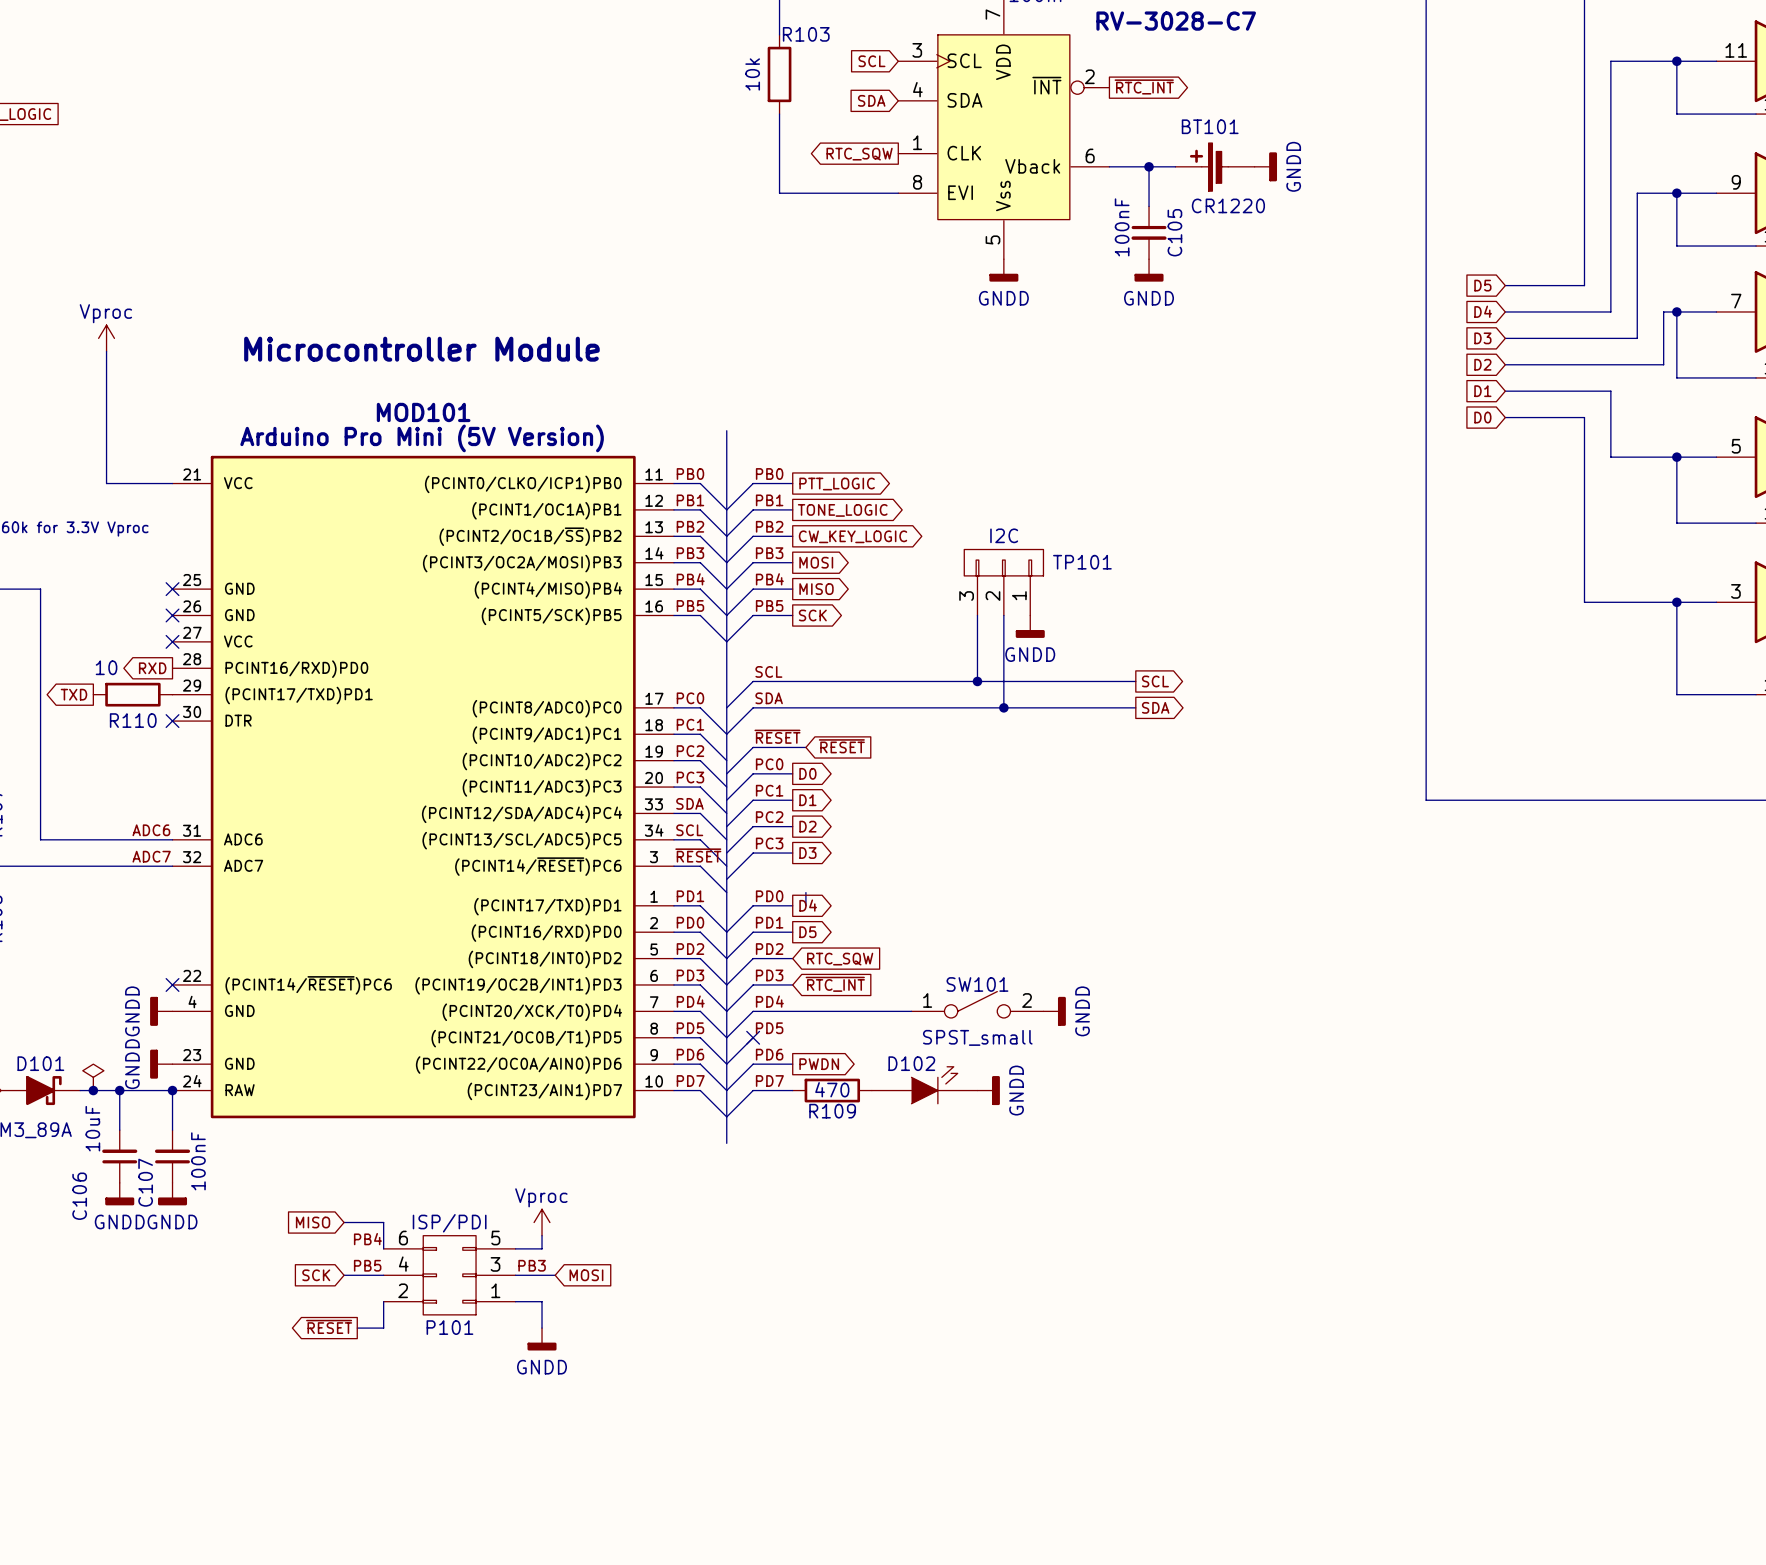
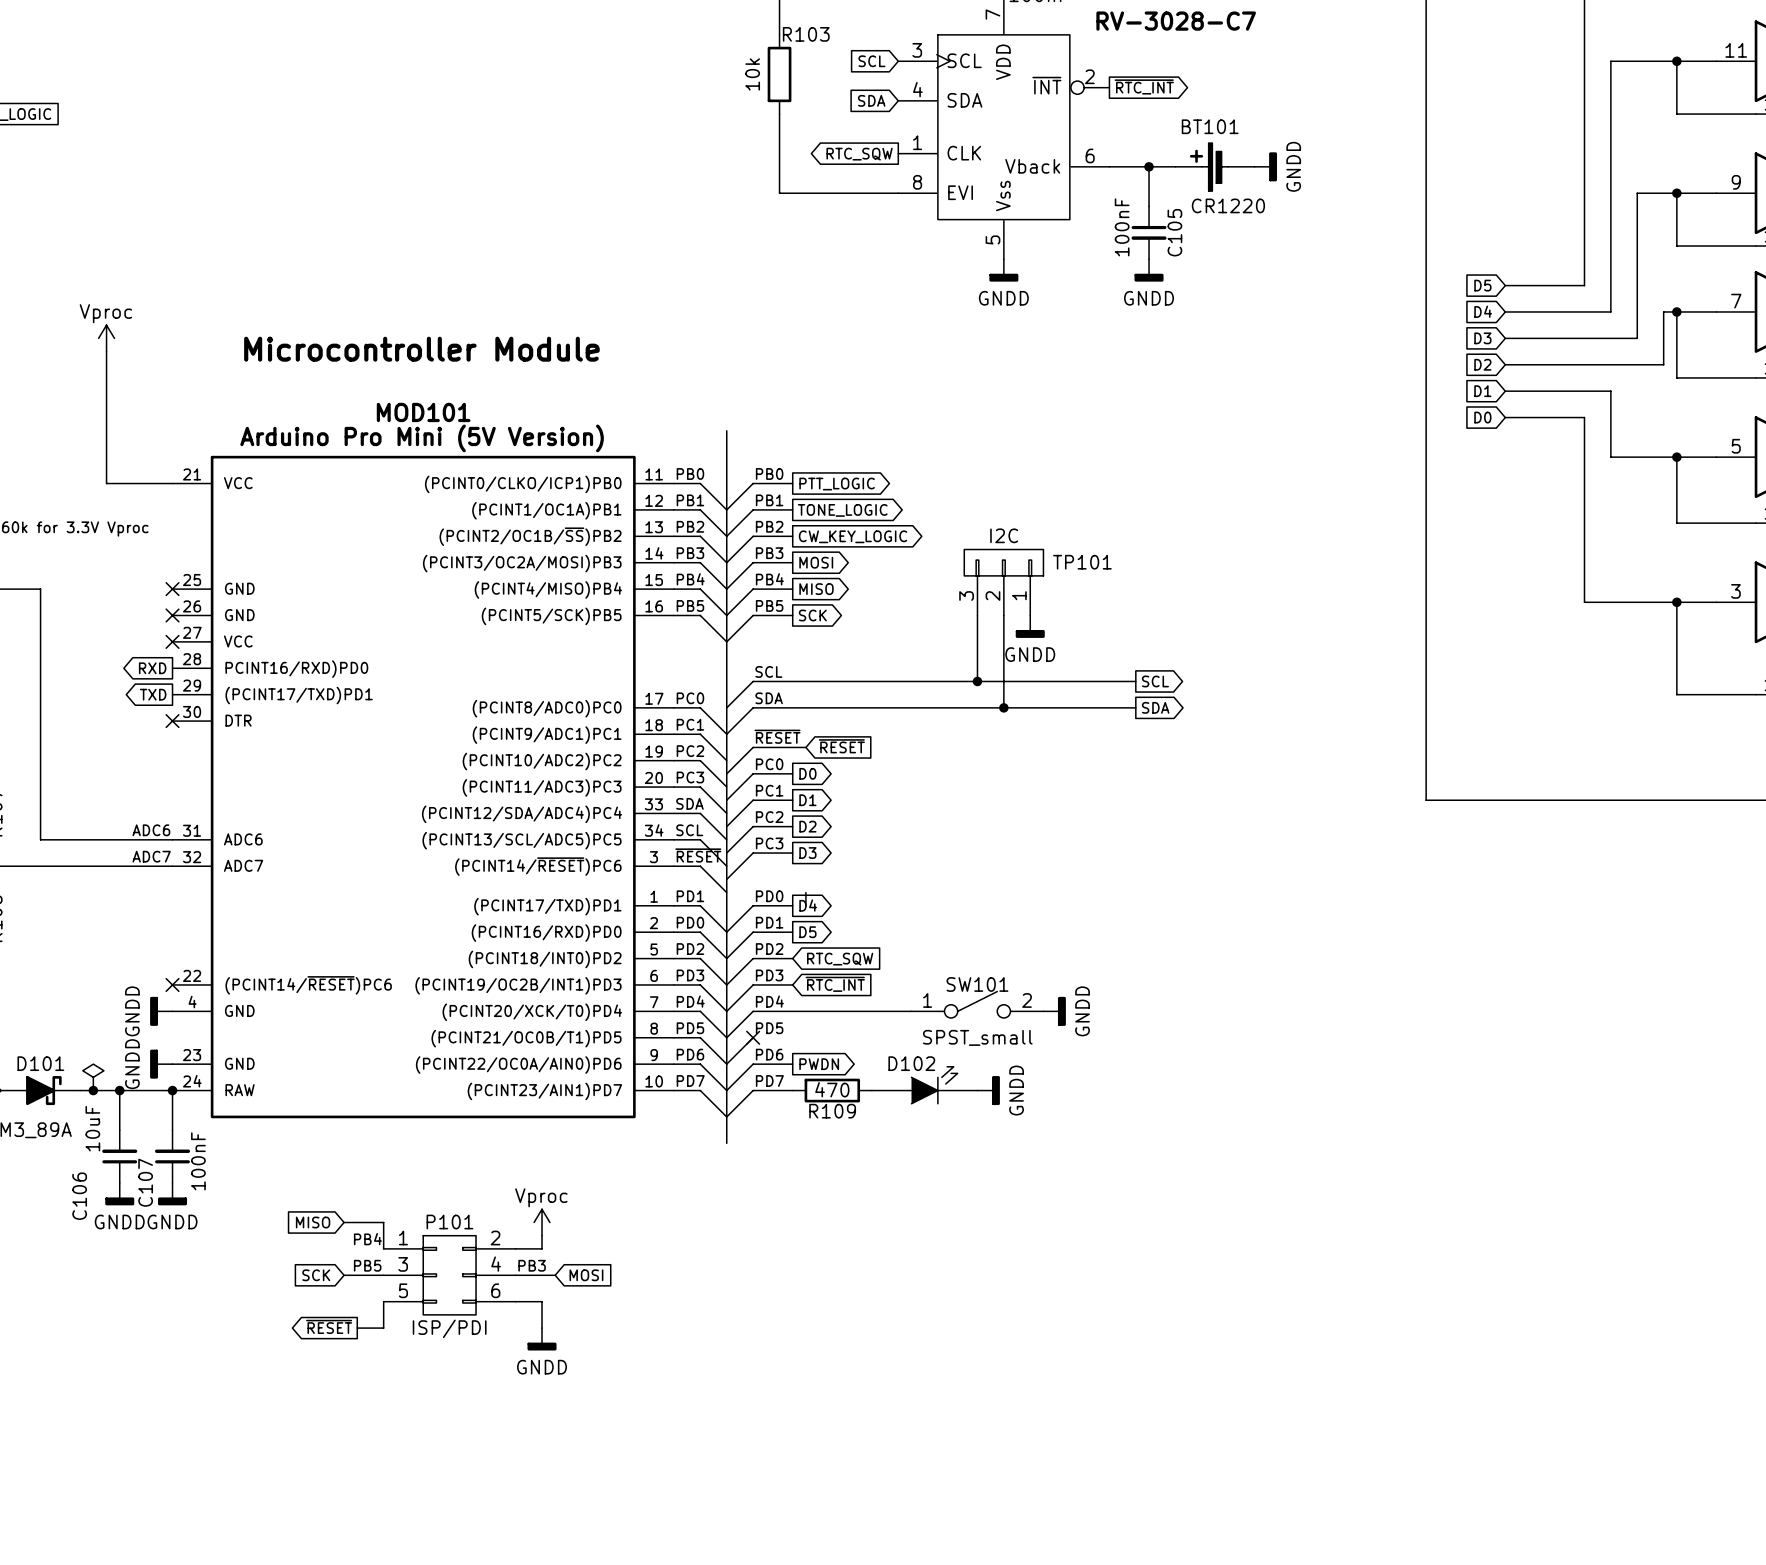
global label position: TXD (73, 694) -> TXD (153, 694)
R110: 10 (132, 694) -> none
P101 rotation: 0° (449, 1275) -> 180° (449, 1275)

